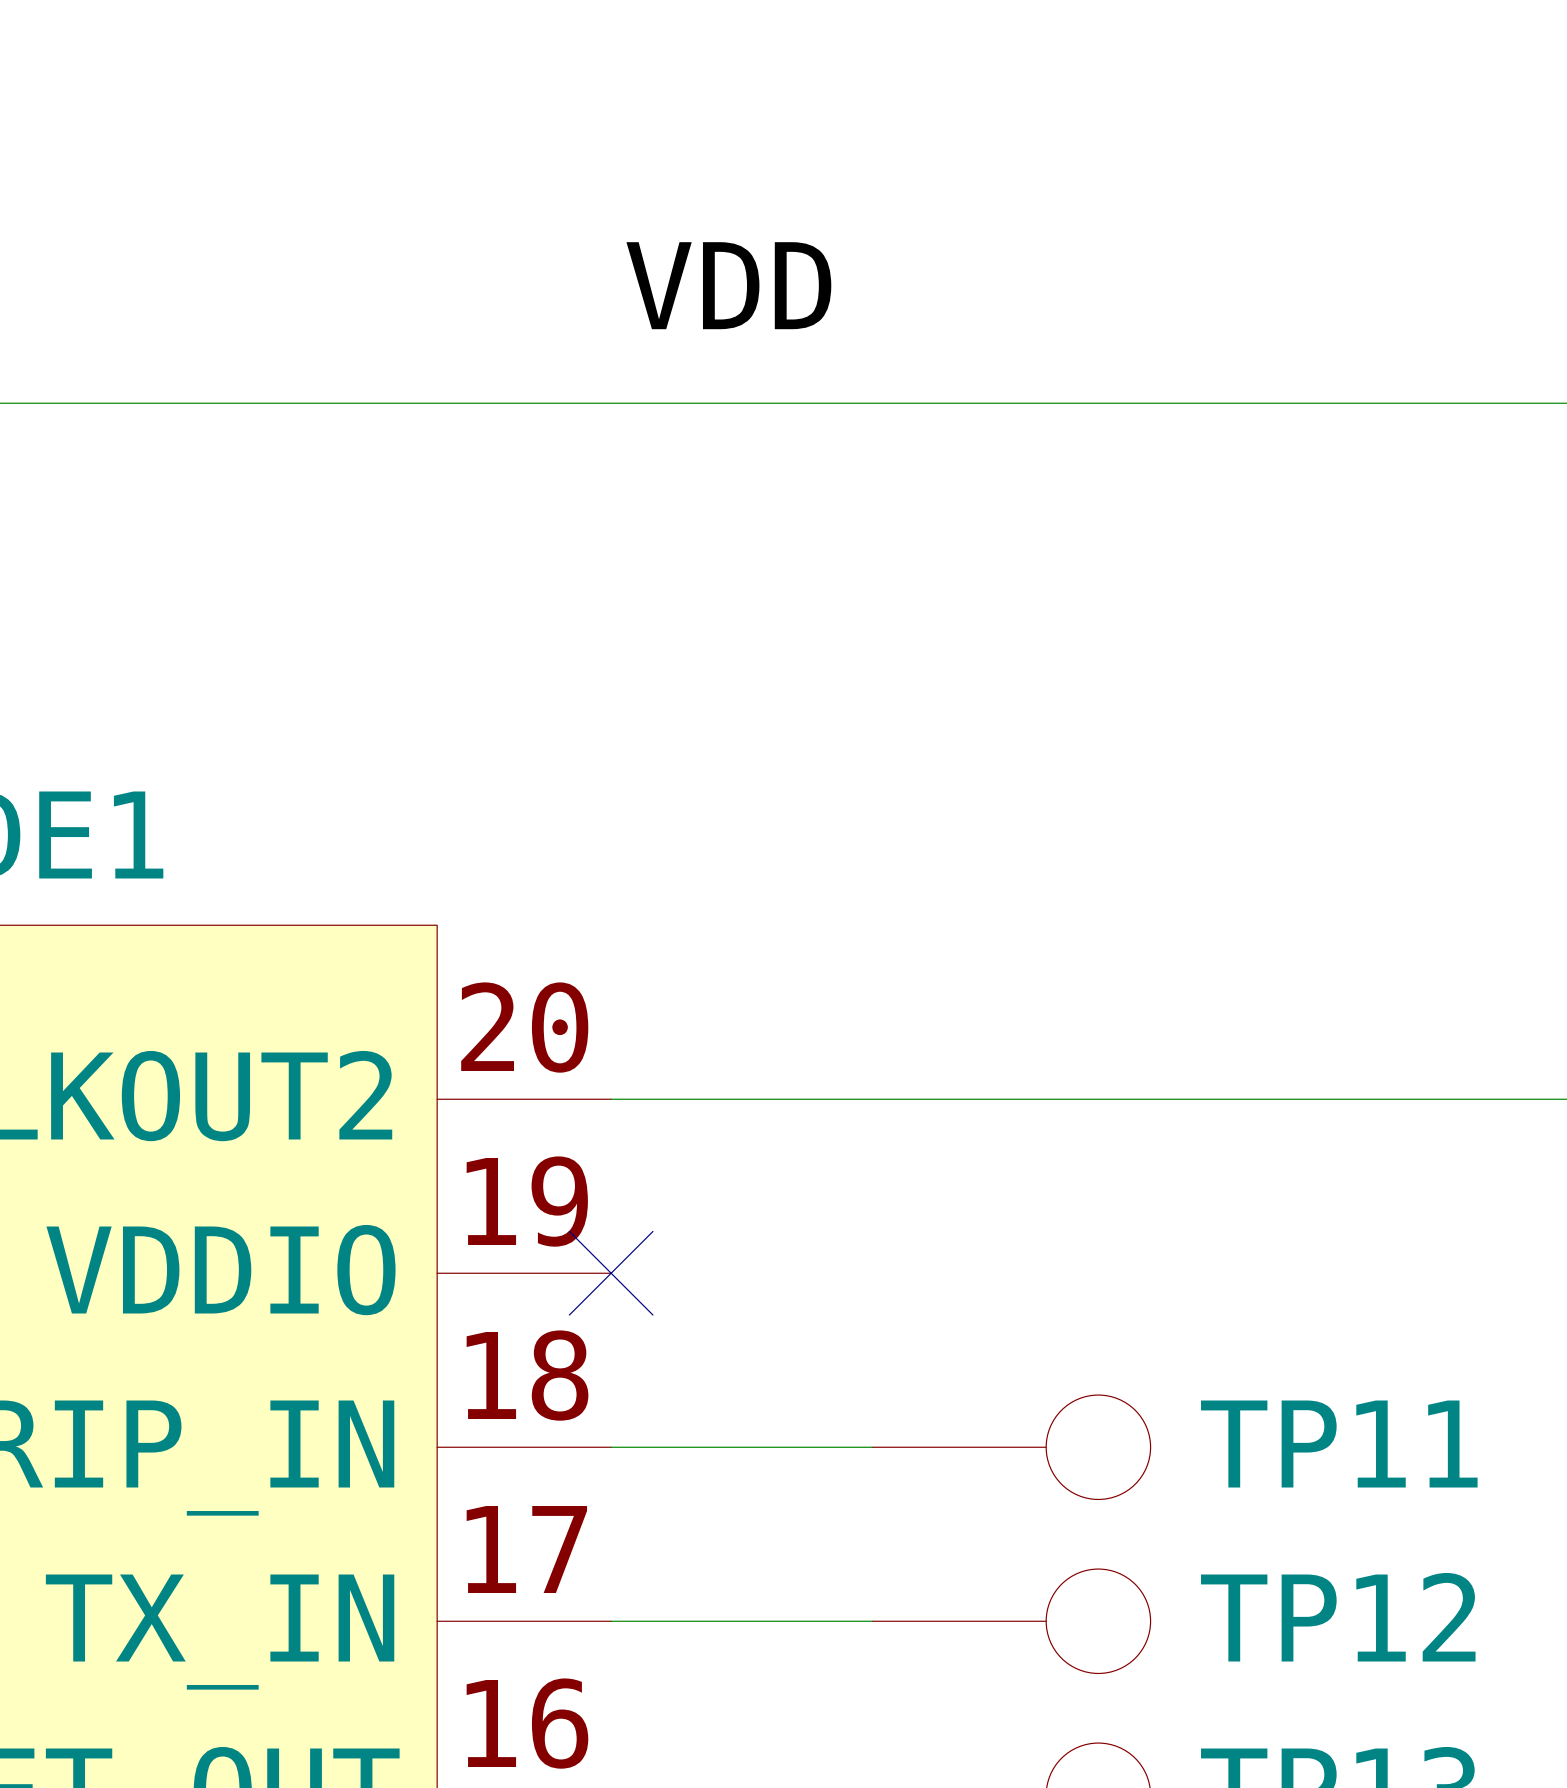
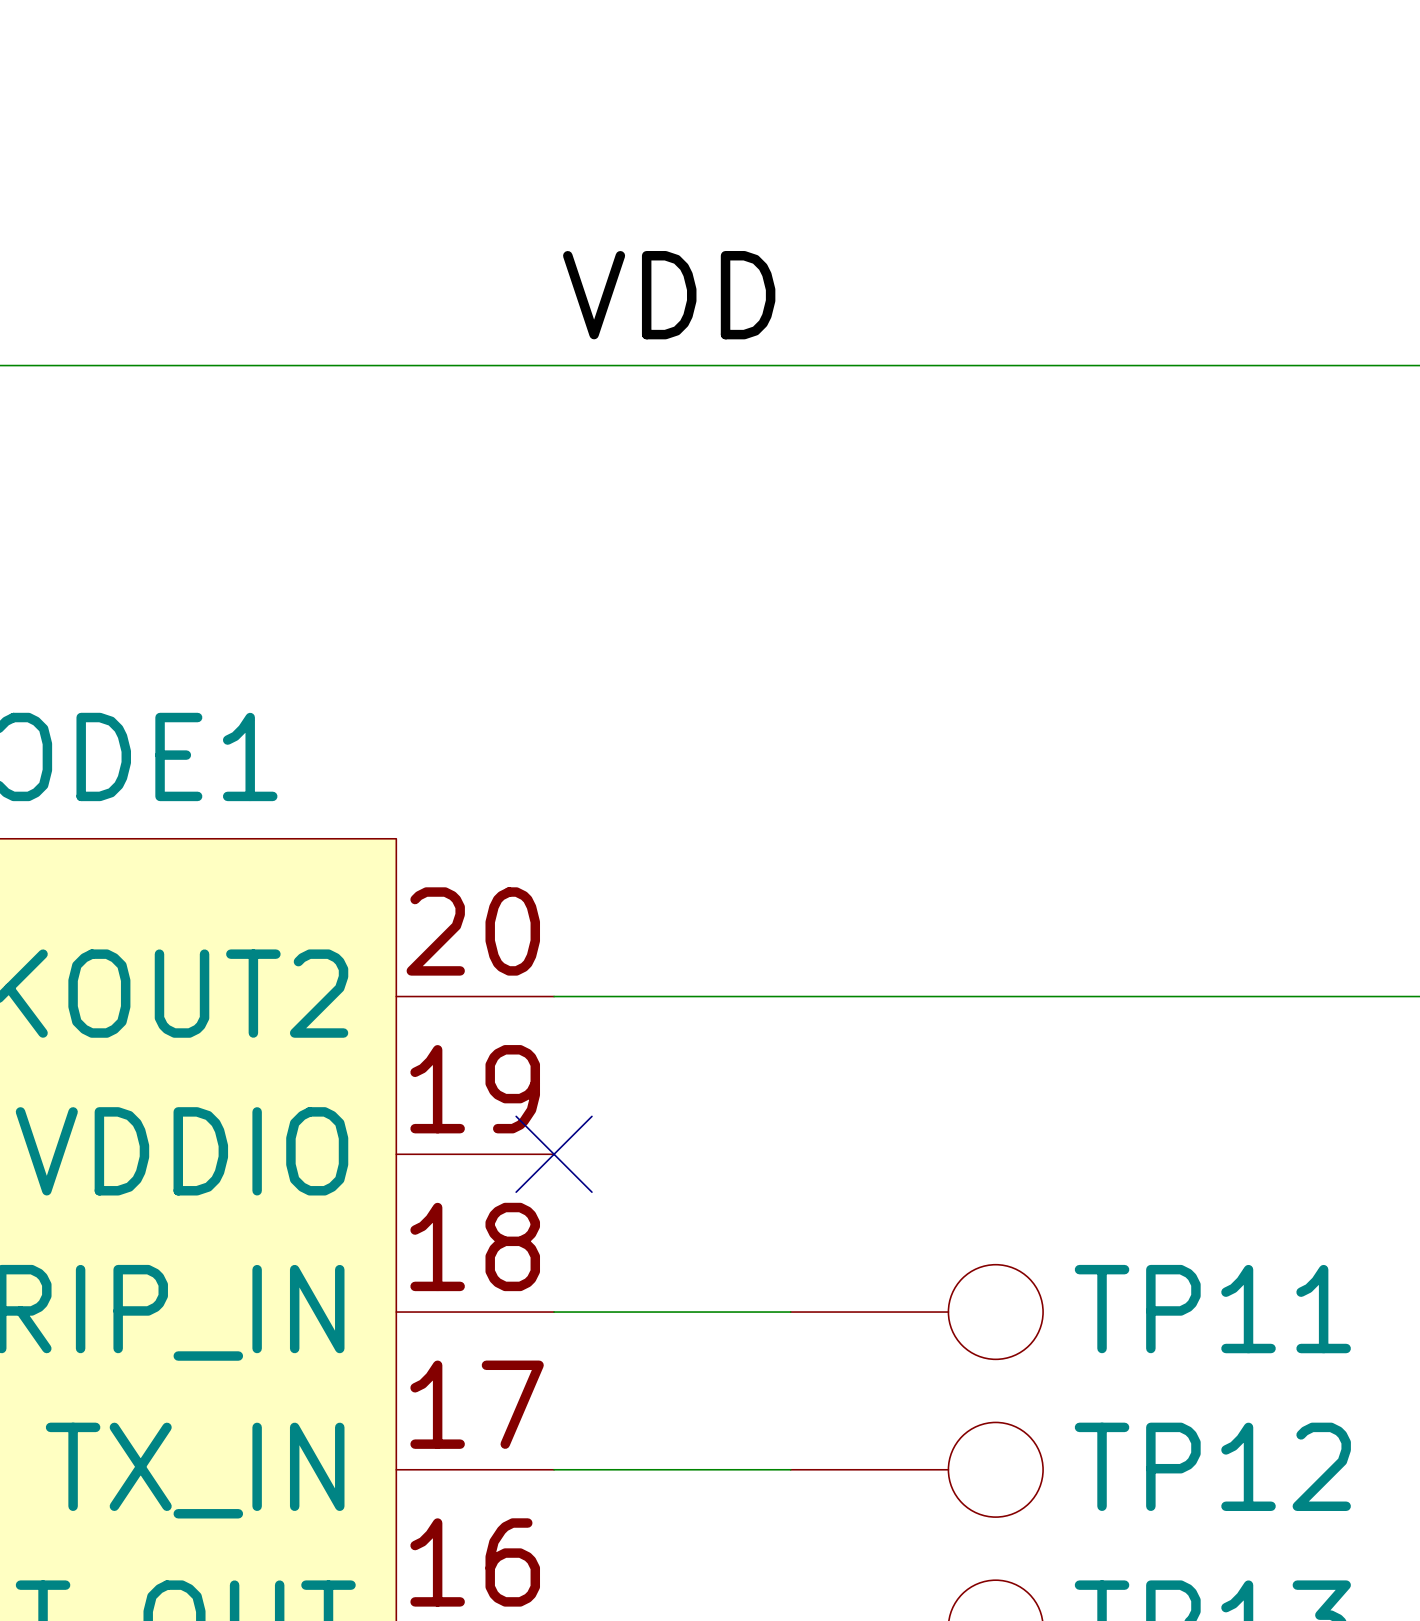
label position: VDD (728, 285) -> VDD (669, 295)

